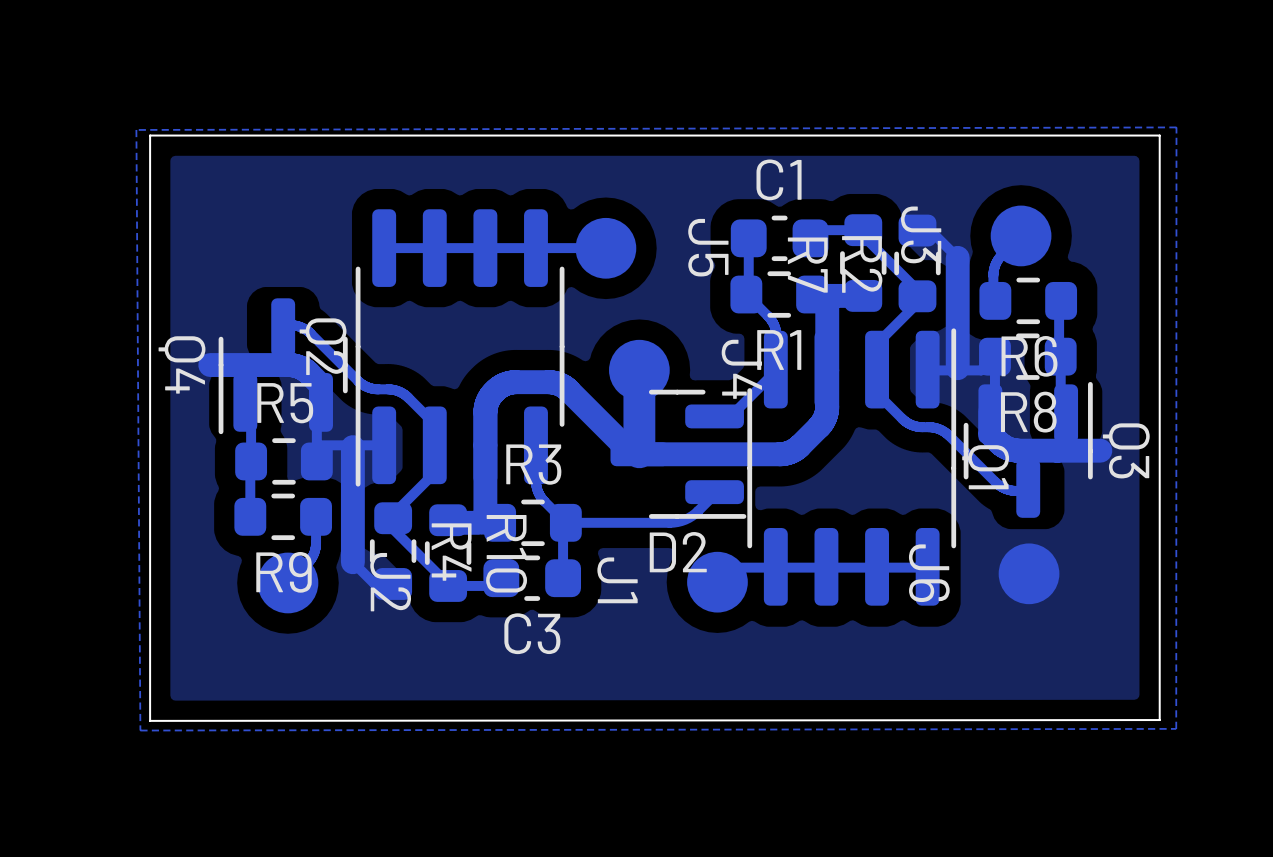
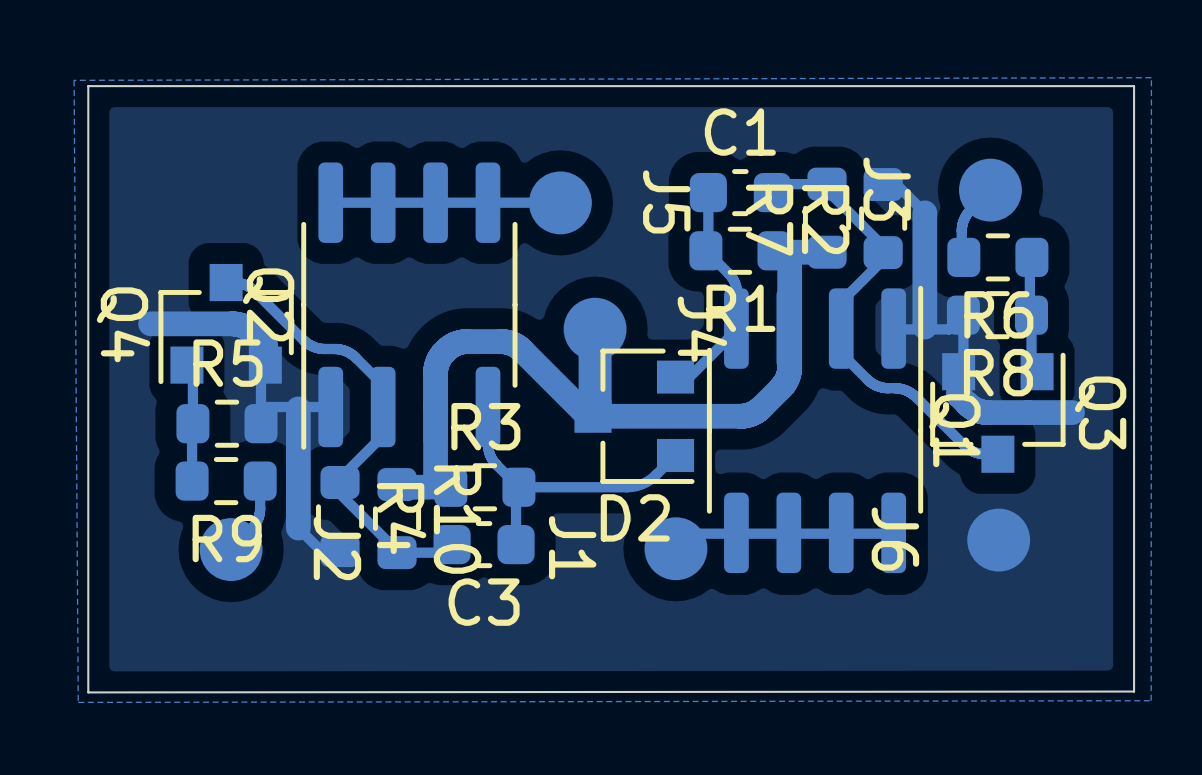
Q4 footprint: [218, 298, 348, 435] -> [158, 263, 294, 385]
Q3 footprint: [963, 381, 1093, 518] -> [930, 352, 1066, 473]
D2 footprint: [610, 389, 747, 519] -> [574, 348, 695, 484]

